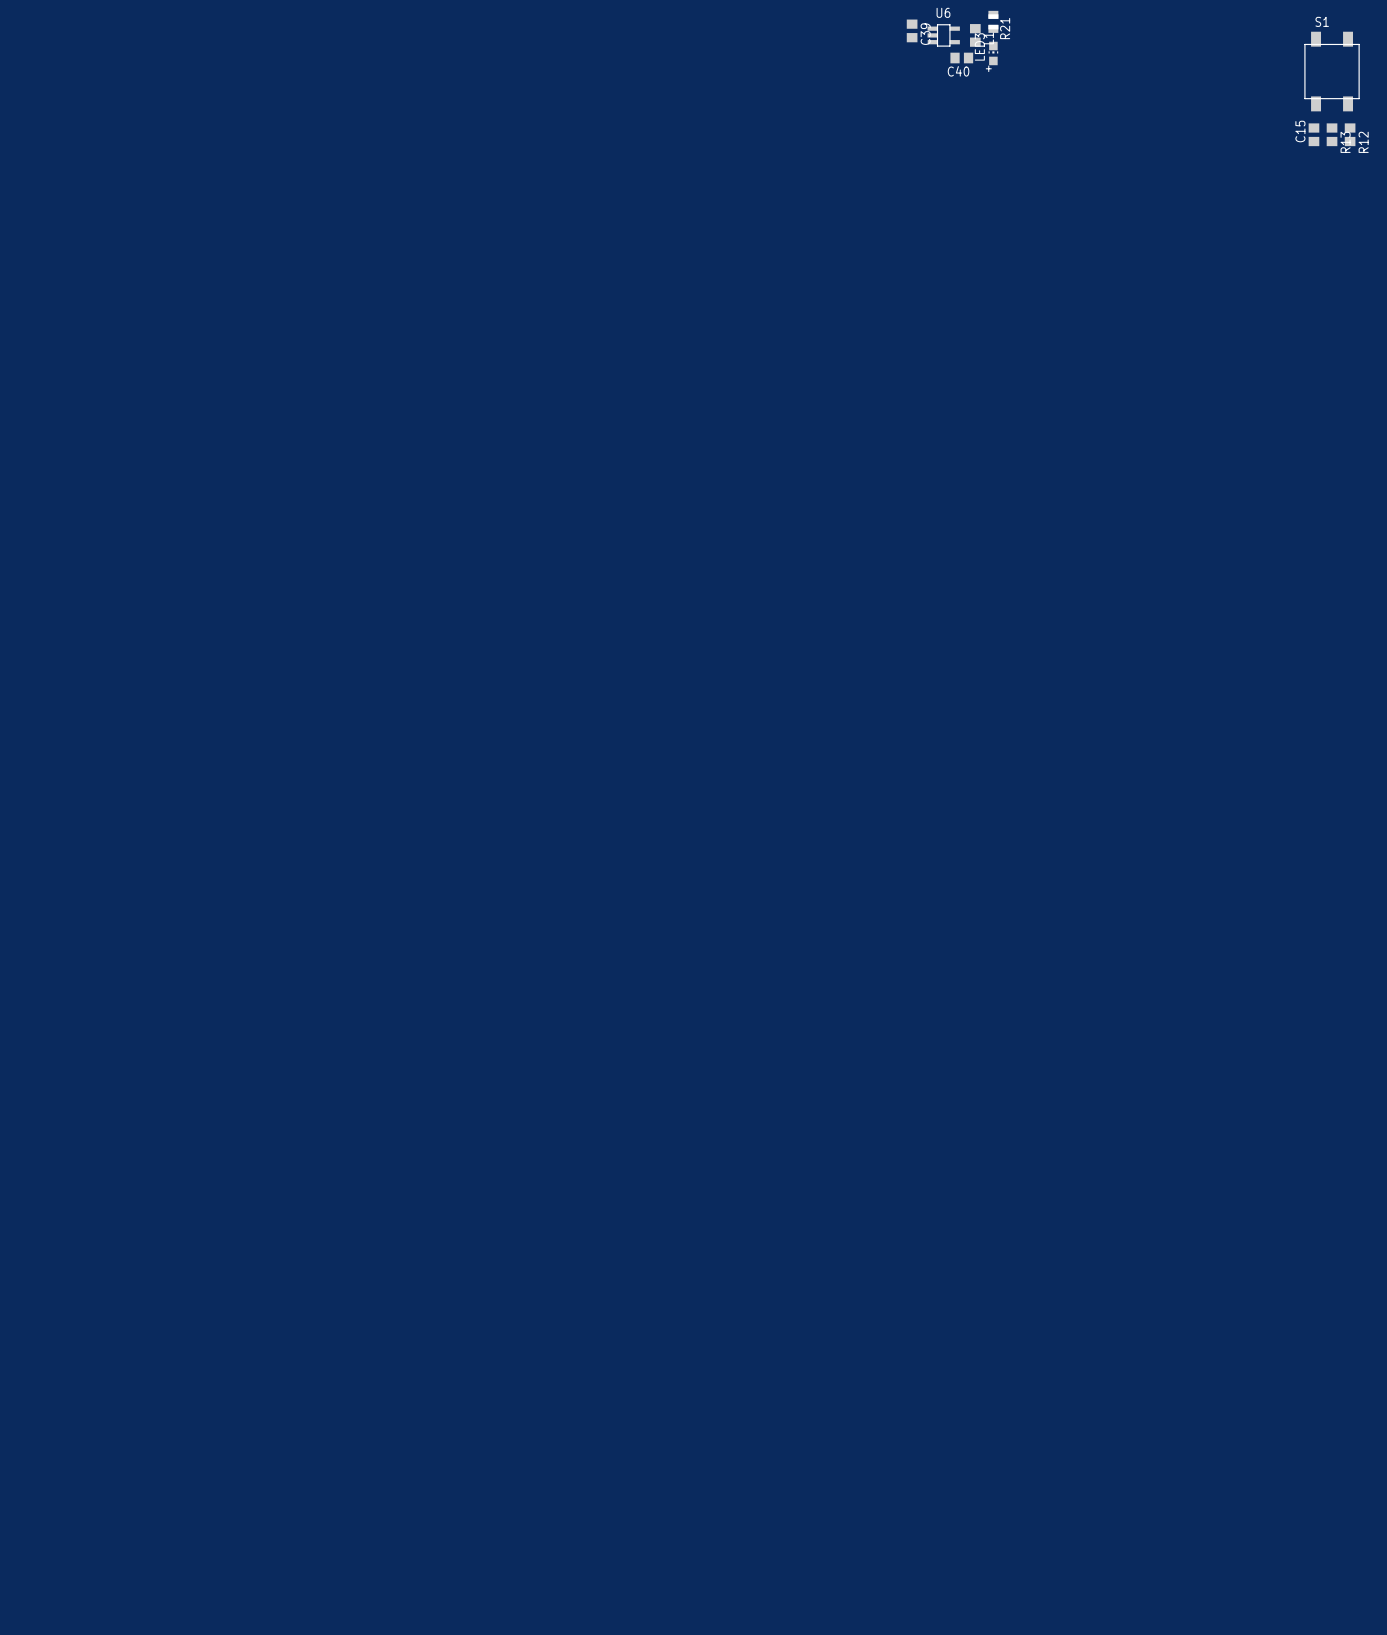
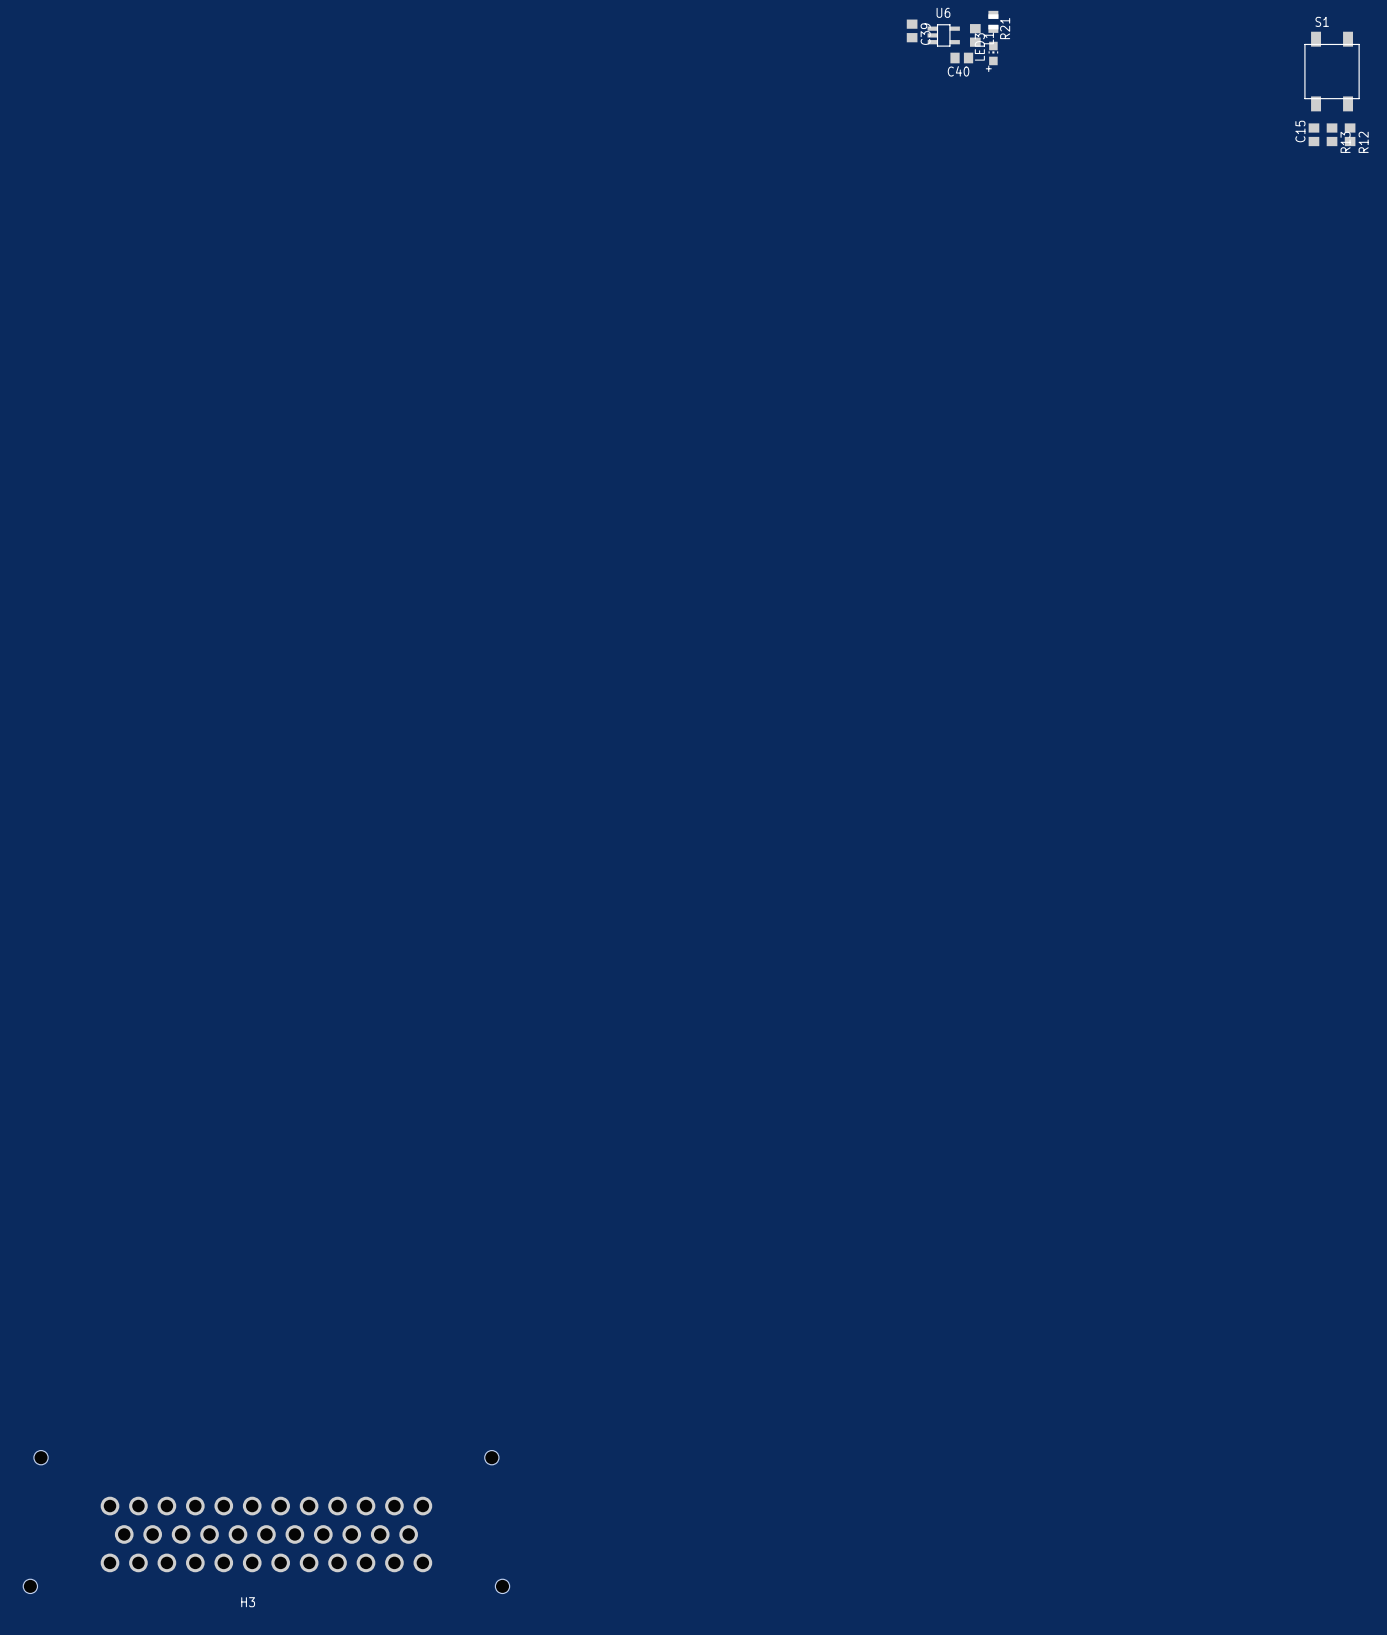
H3: none -> (266, 1522)

